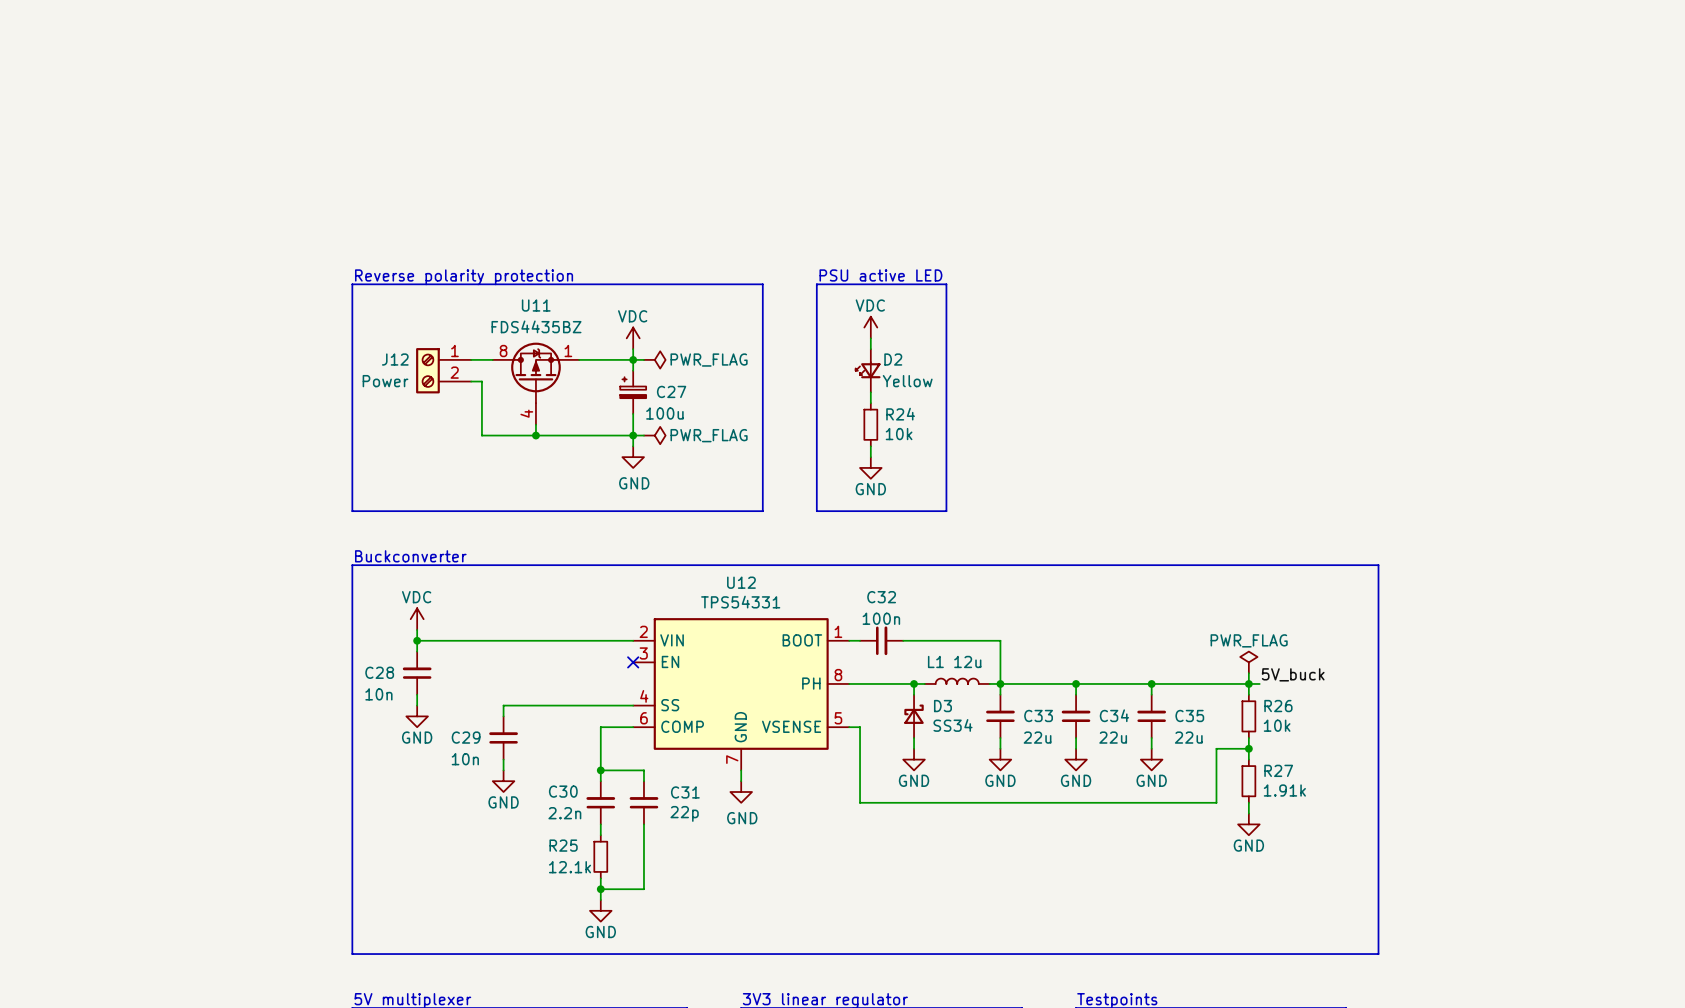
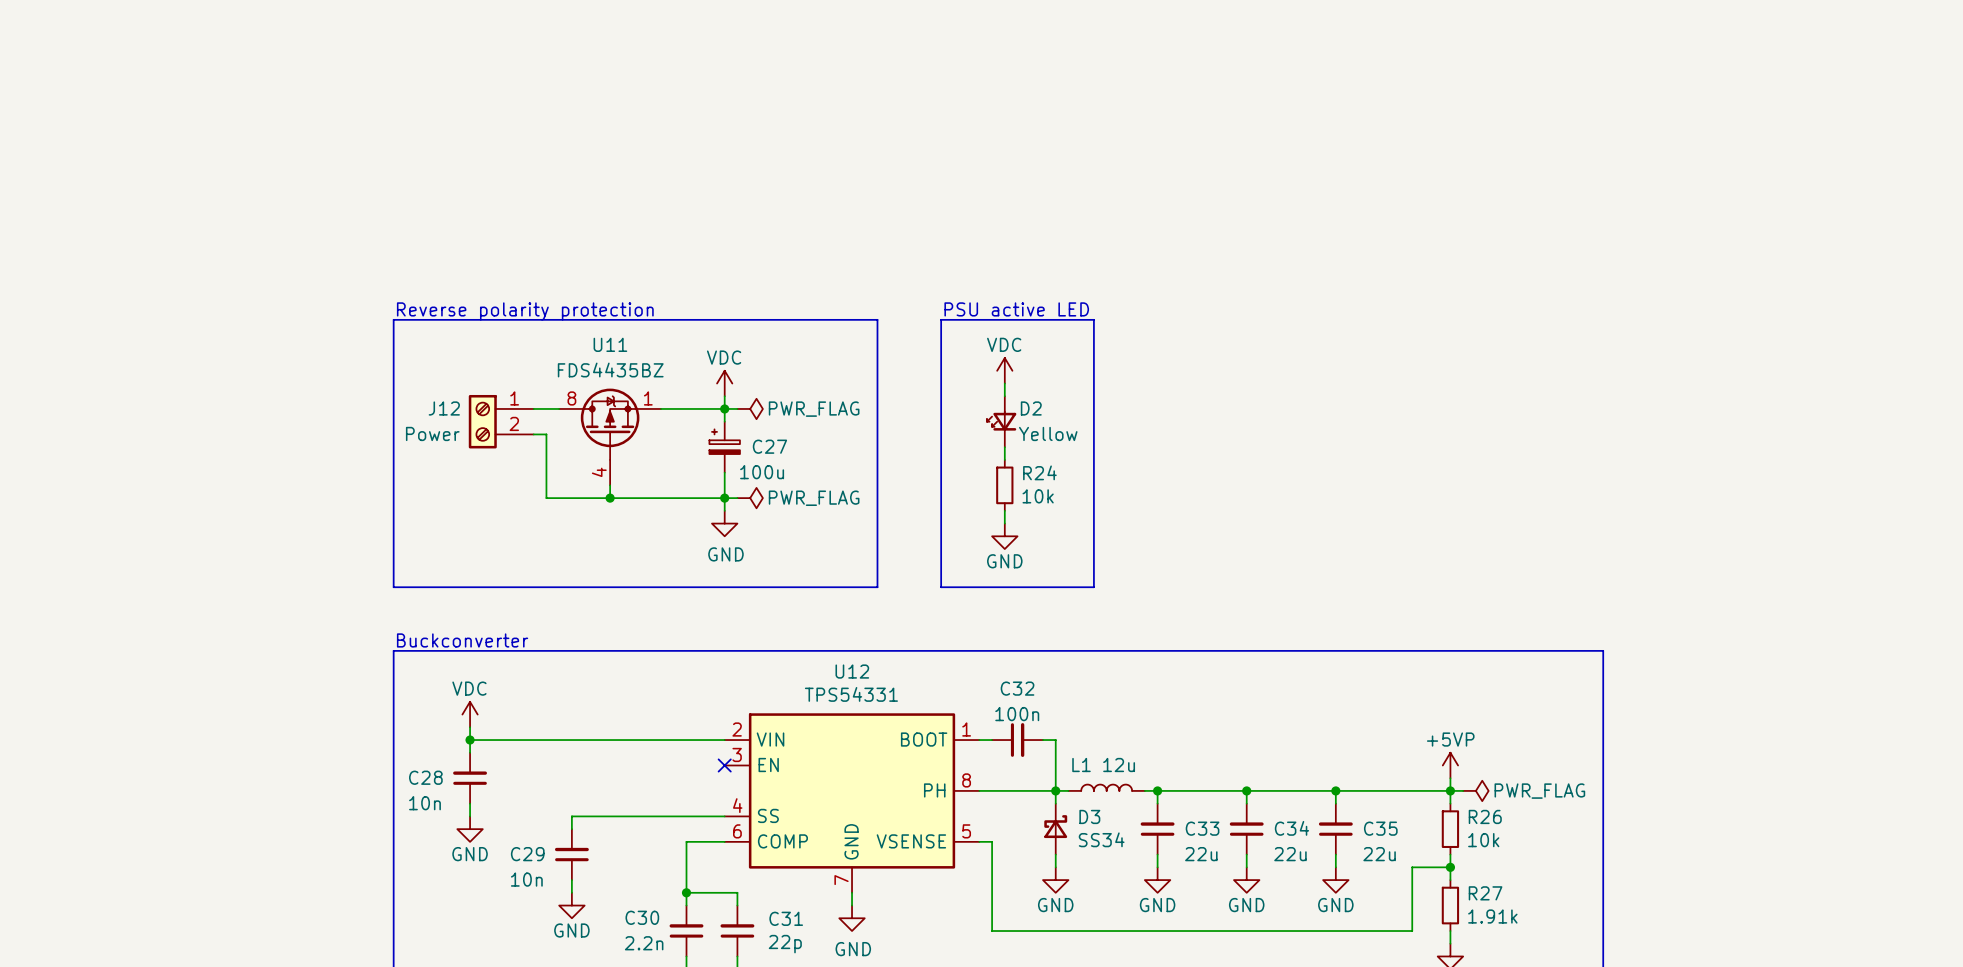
wire: (914, 640) (1000, 640) (1000, 683) -> (1055, 740) (1055, 790)
power symbol: PWR_FLAG (1248, 662) -> +5VP (1450, 765)
label: 5V_buck (1293, 674) -> none
power symbol: none -> PWR_FLAG (1475, 790)

